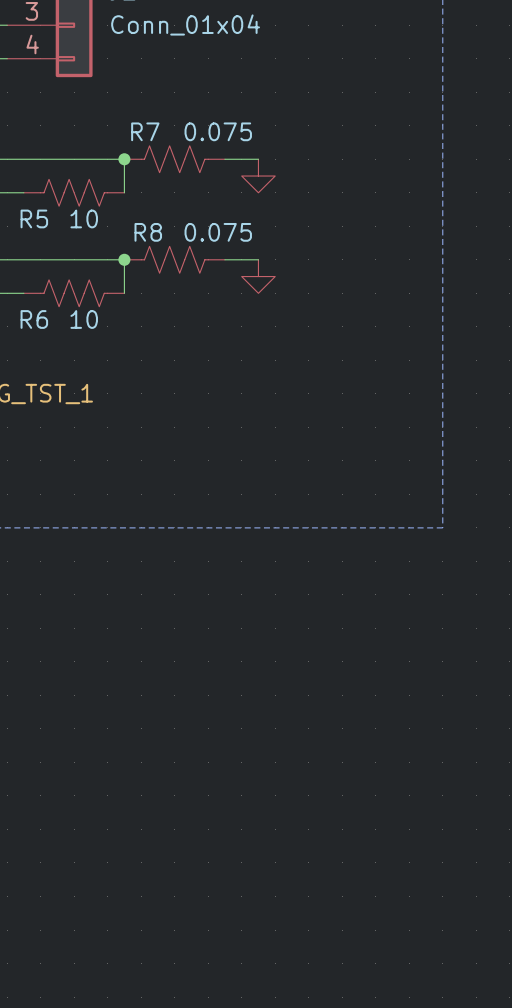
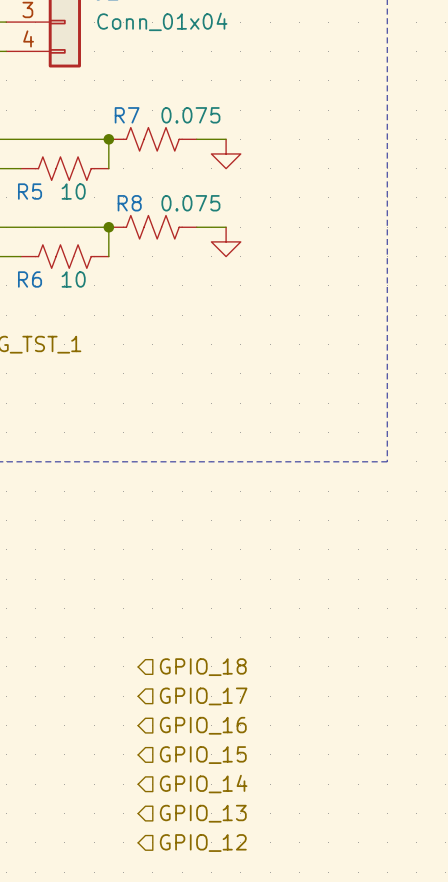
hierarchical label: none -> GPIO_18 (203, 667)
hierarchical label: none -> GPIO_17 (203, 696)
hierarchical label: none -> GPIO_16 (203, 725)
hierarchical label: none -> GPIO_15 (203, 755)
hierarchical label: none -> GPIO_14 (203, 784)
hierarchical label: none -> GPIO_13 (203, 813)
hierarchical label: none -> GPIO_12 (203, 843)

